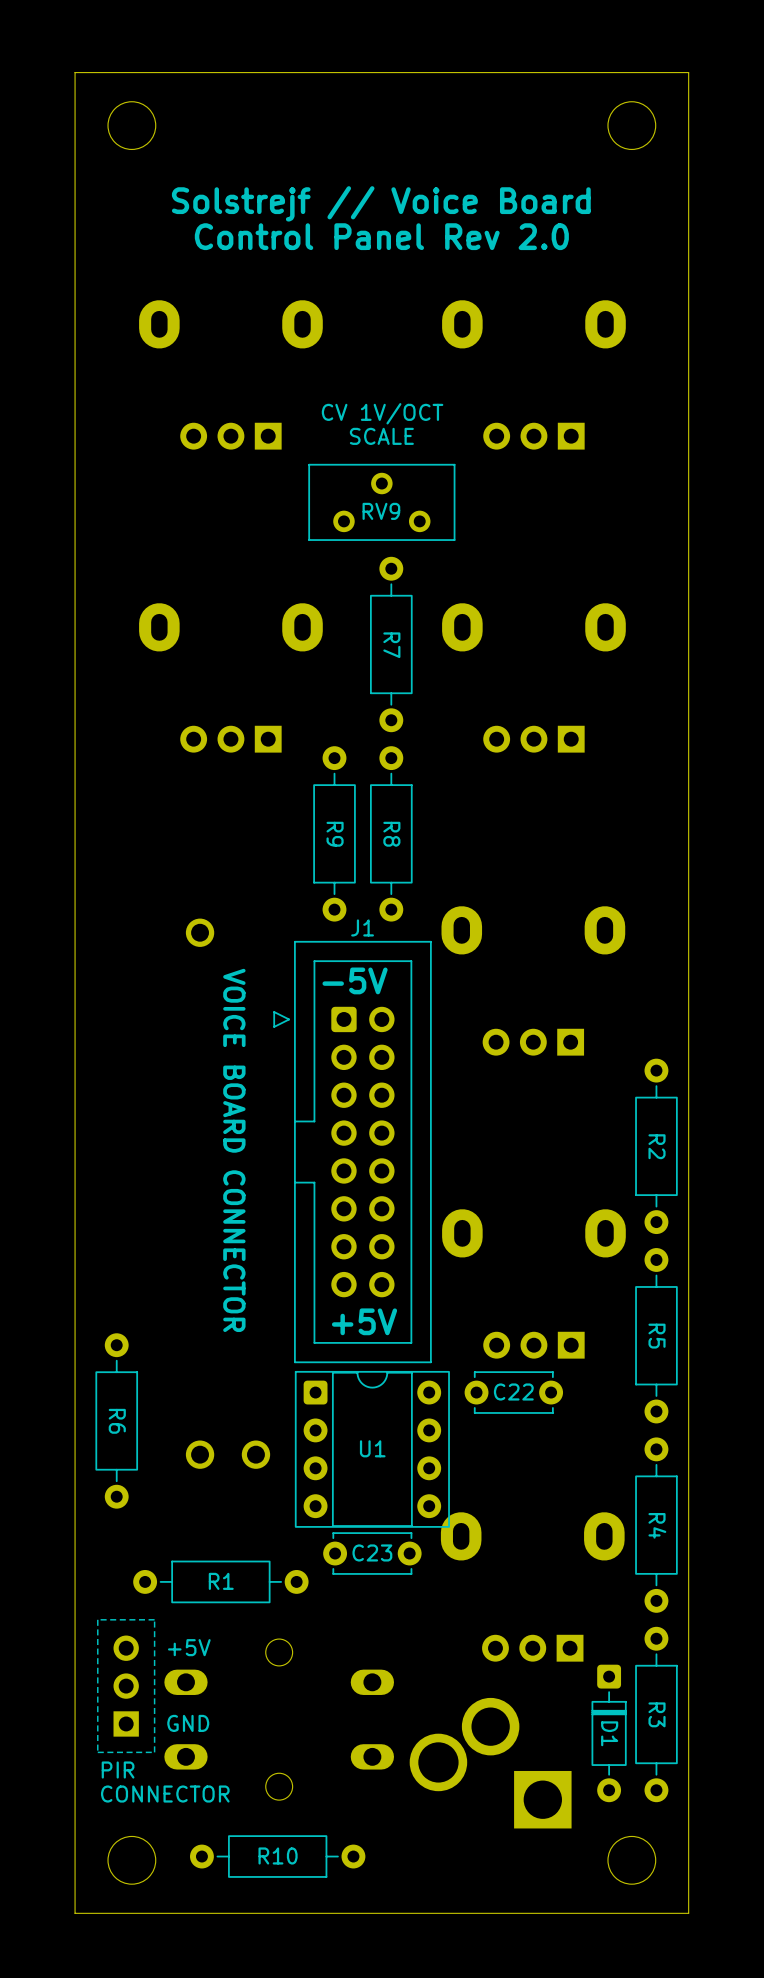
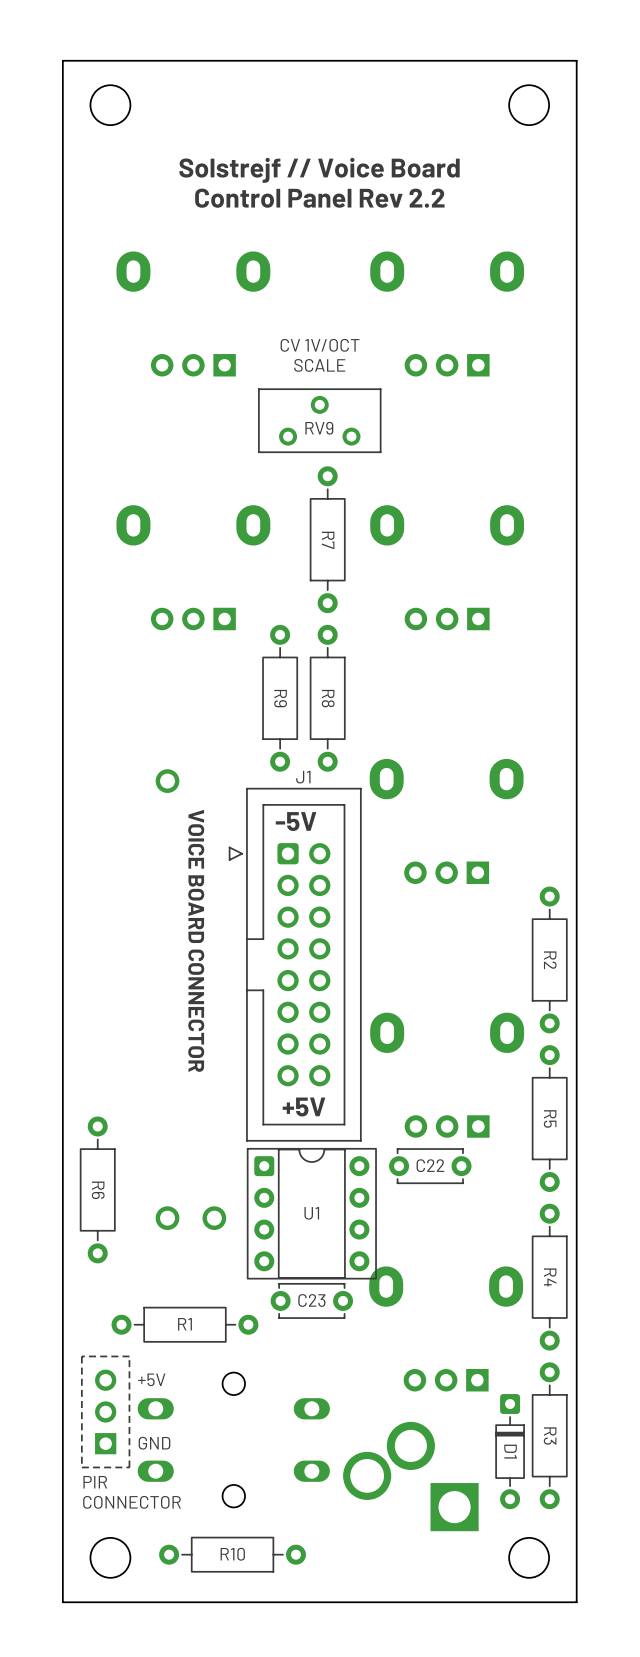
text: Control Panel Rev 2.0 (381, 236) -> Control Panel Rev 2.2 (319, 198)

